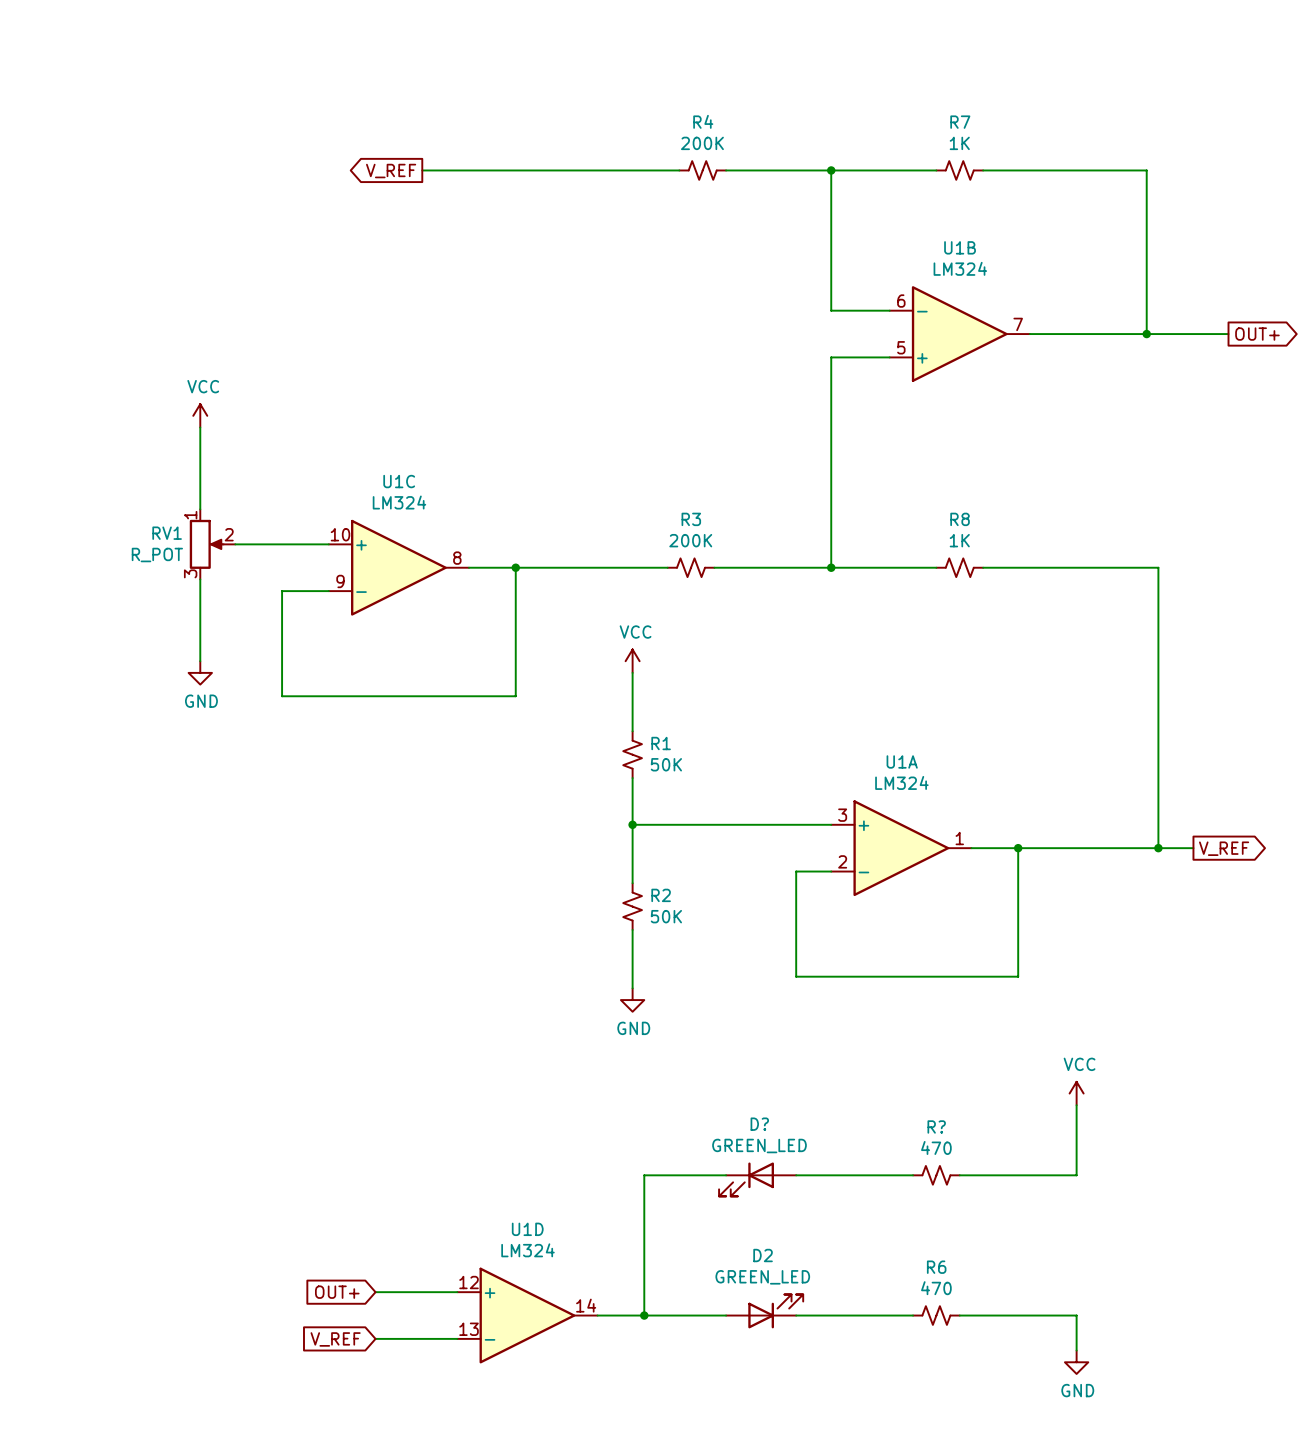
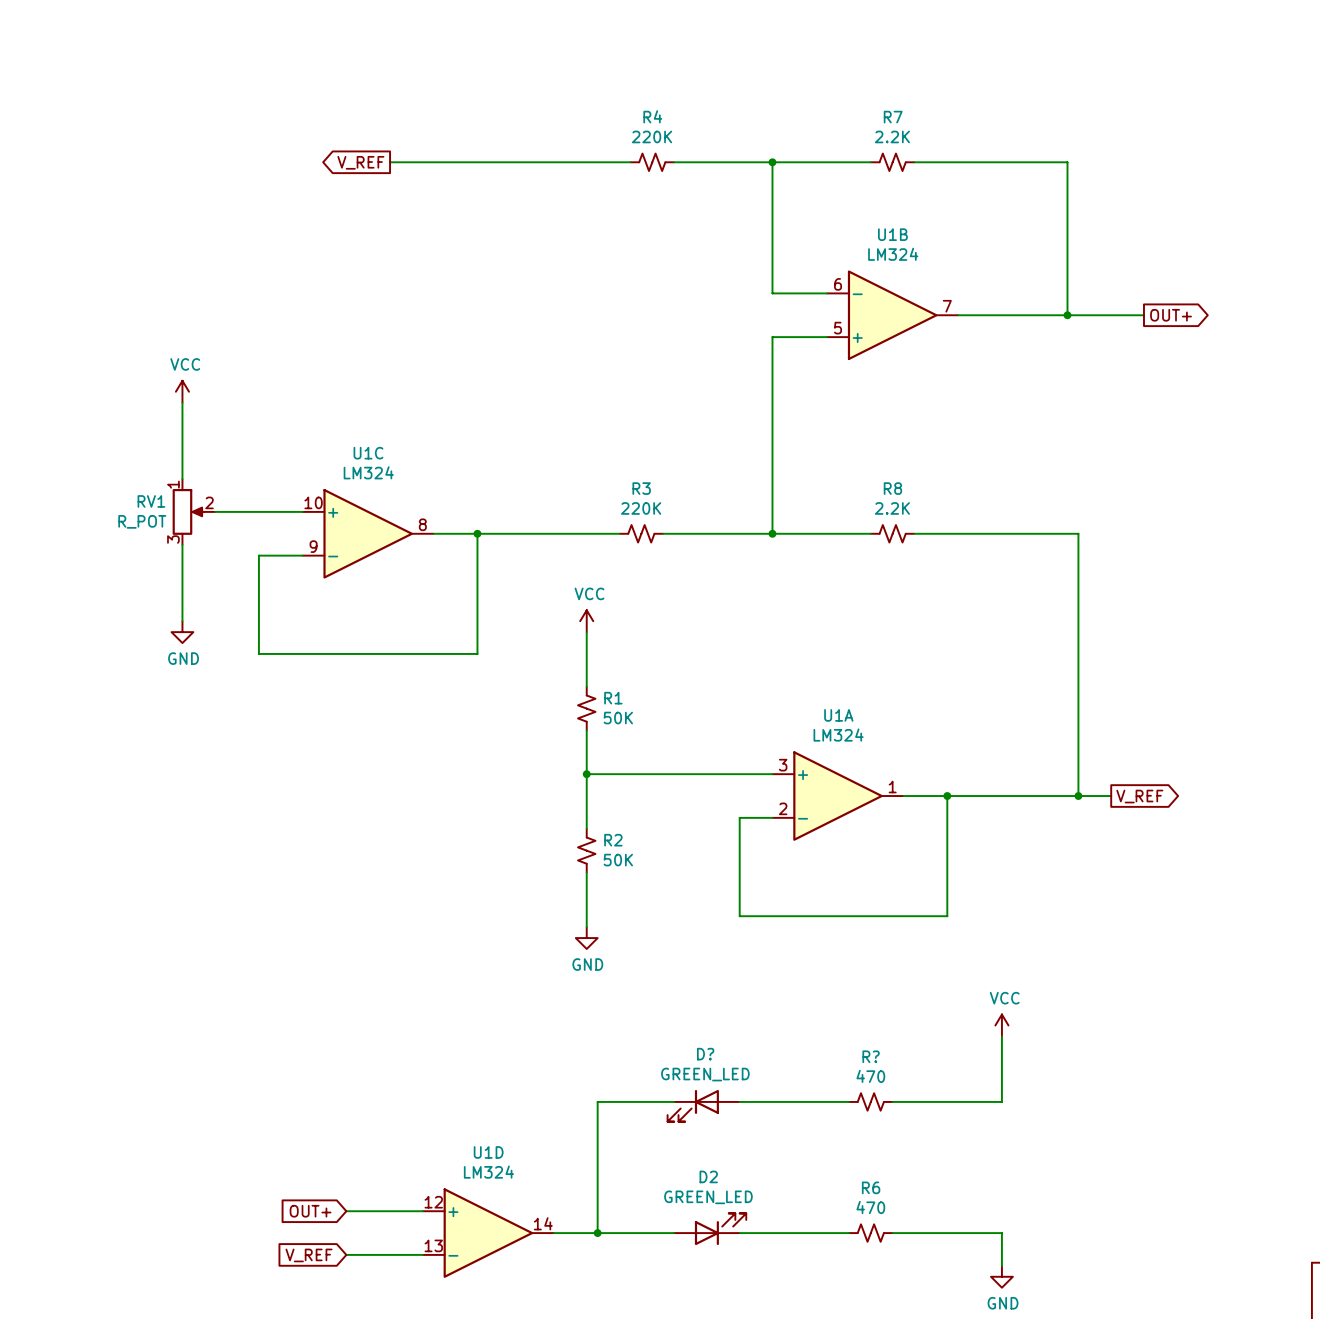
R4 value: 200K (702, 143) -> 220K (652, 136)
R7 value: 1K (959, 143) -> 2.2K (892, 136)
R3 value: 200K (690, 540) -> 220K (641, 508)
R8 value: 1K (959, 540) -> 2.2K (892, 508)

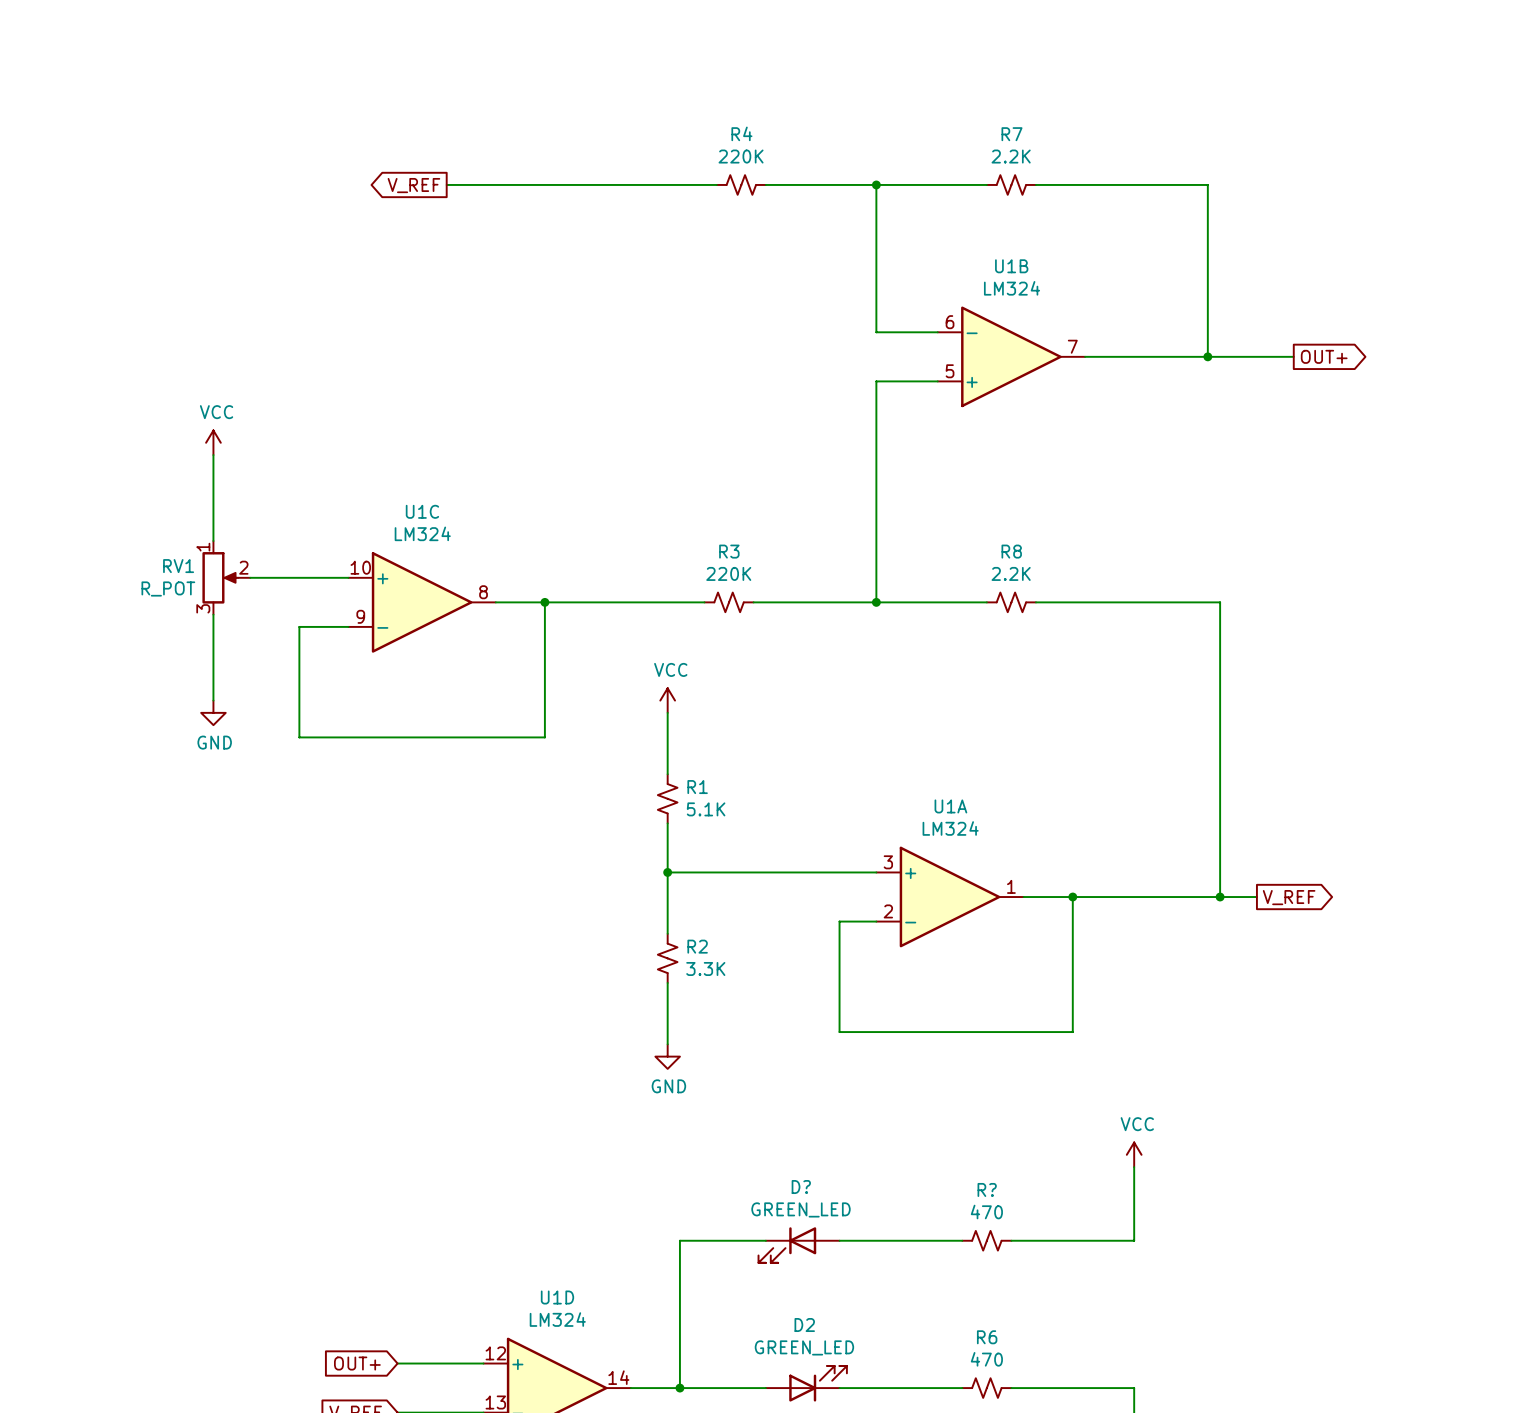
R1 value: 50K (618, 718) -> 5.1K (706, 809)
R2 value: 50K (618, 860) -> 3.3K (705, 968)

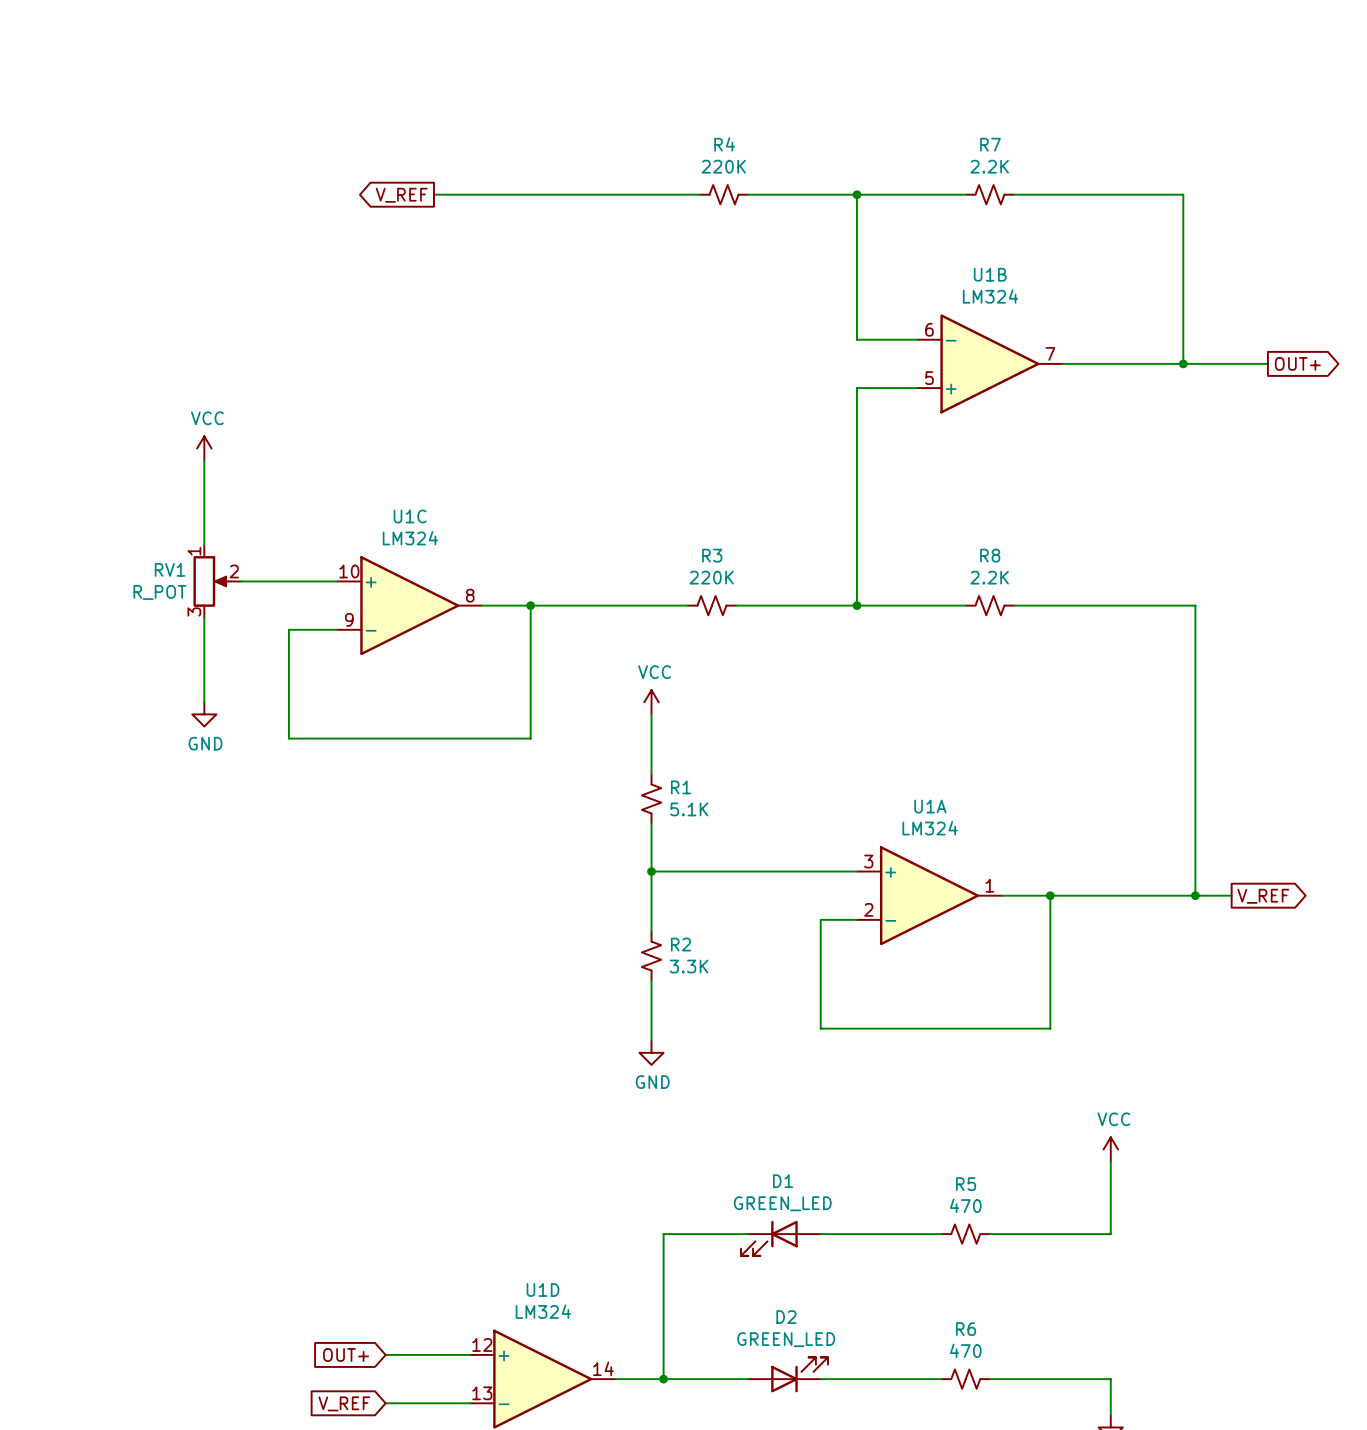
D? name: D? (801, 1187) -> D1 (783, 1181)
R? name: R? (987, 1189) -> R5 (966, 1184)

